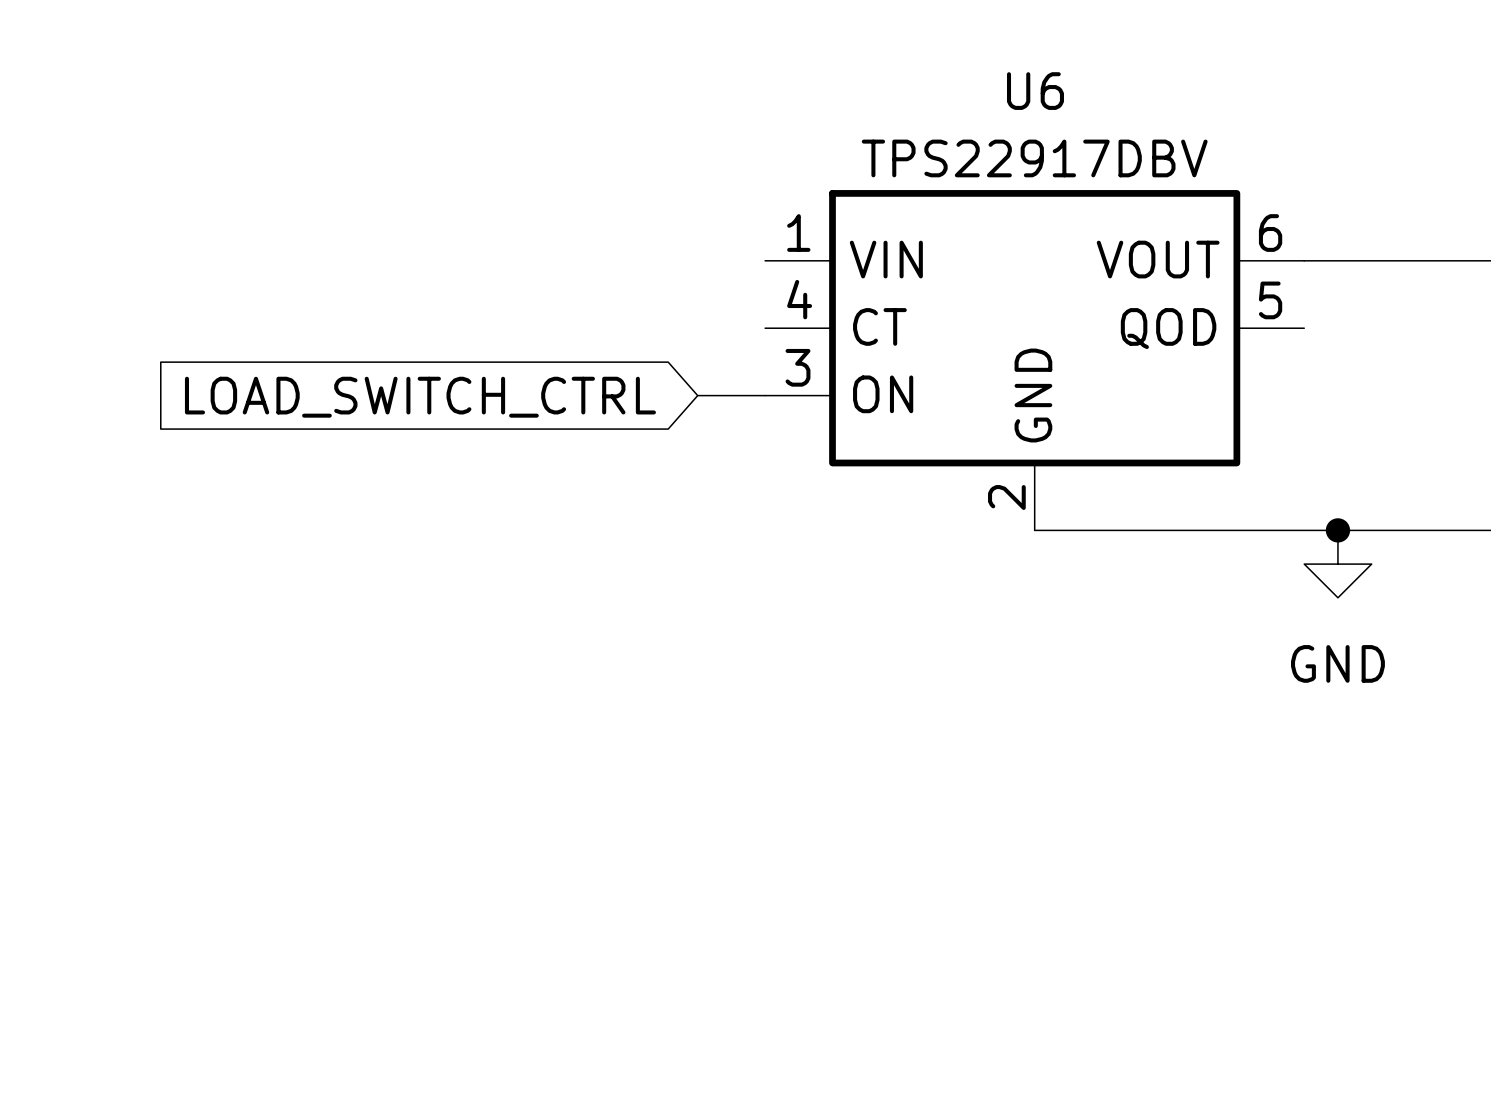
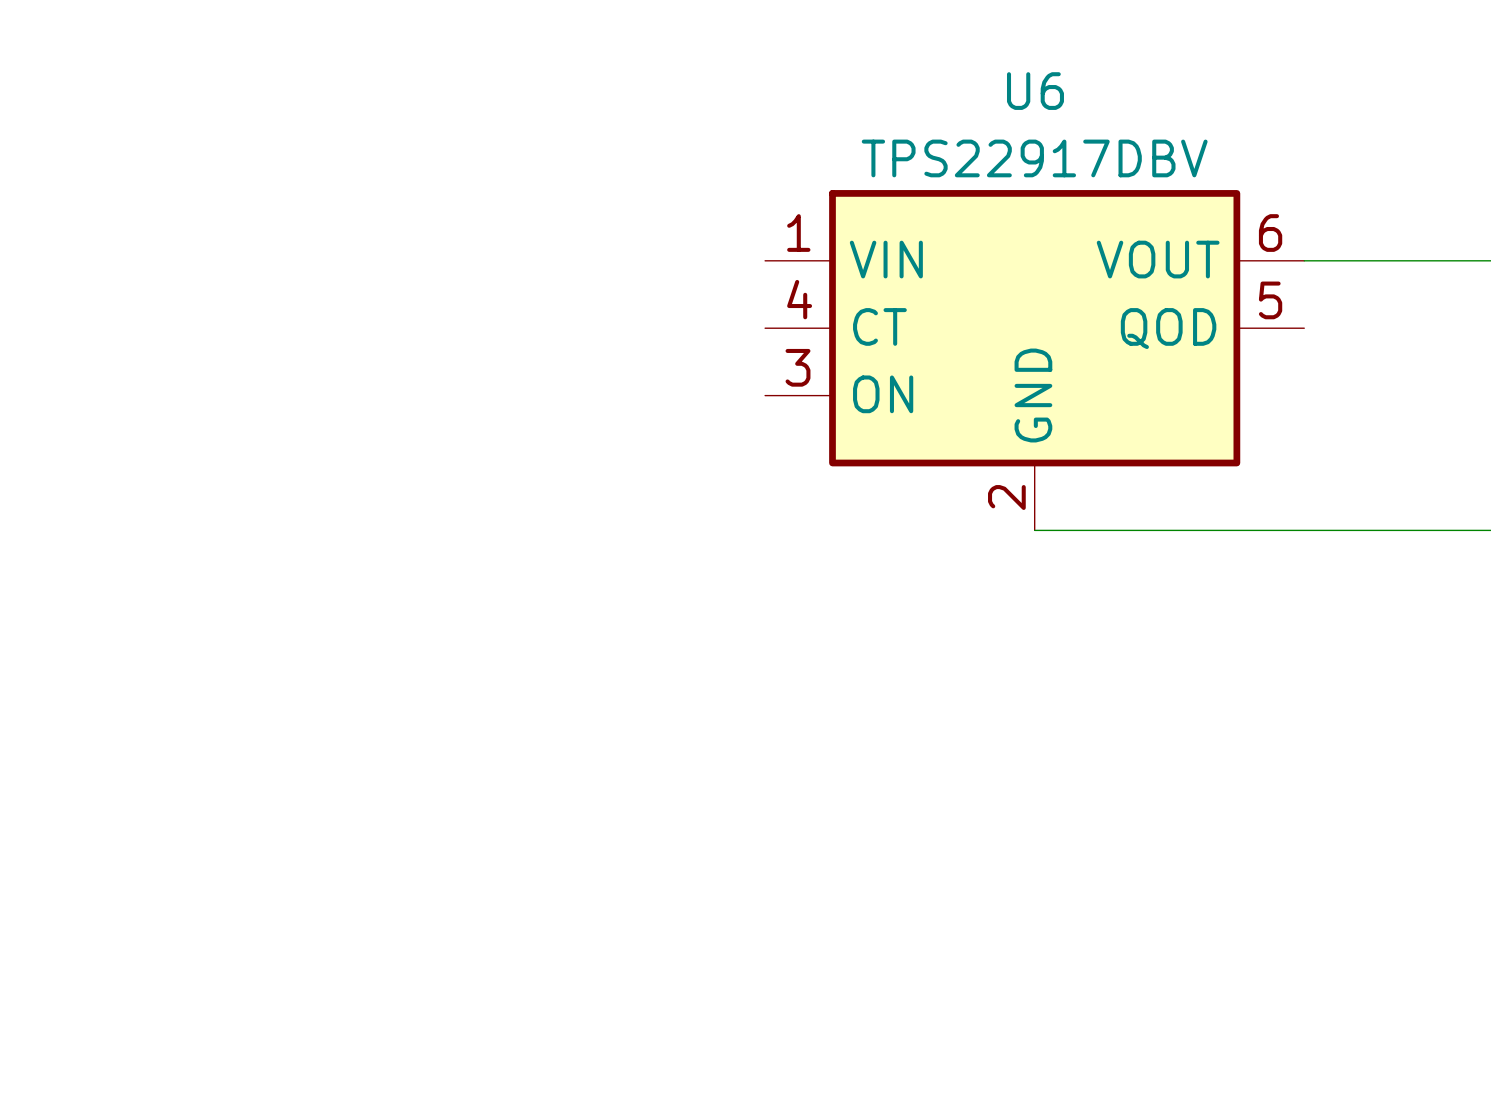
wire: (697, 395) (765, 395) -> none
global label: LOAD_SWITCH_CTRL (420, 397) -> none
junction: (1337, 530) -> none
power symbol: GND (1337, 564) -> none

